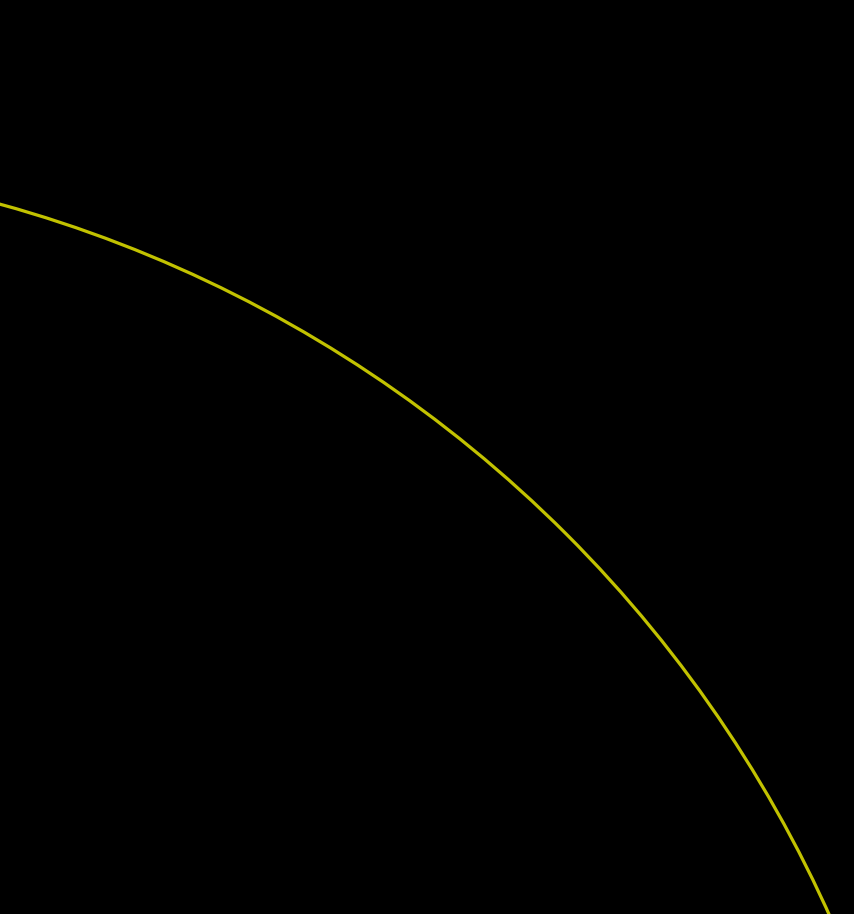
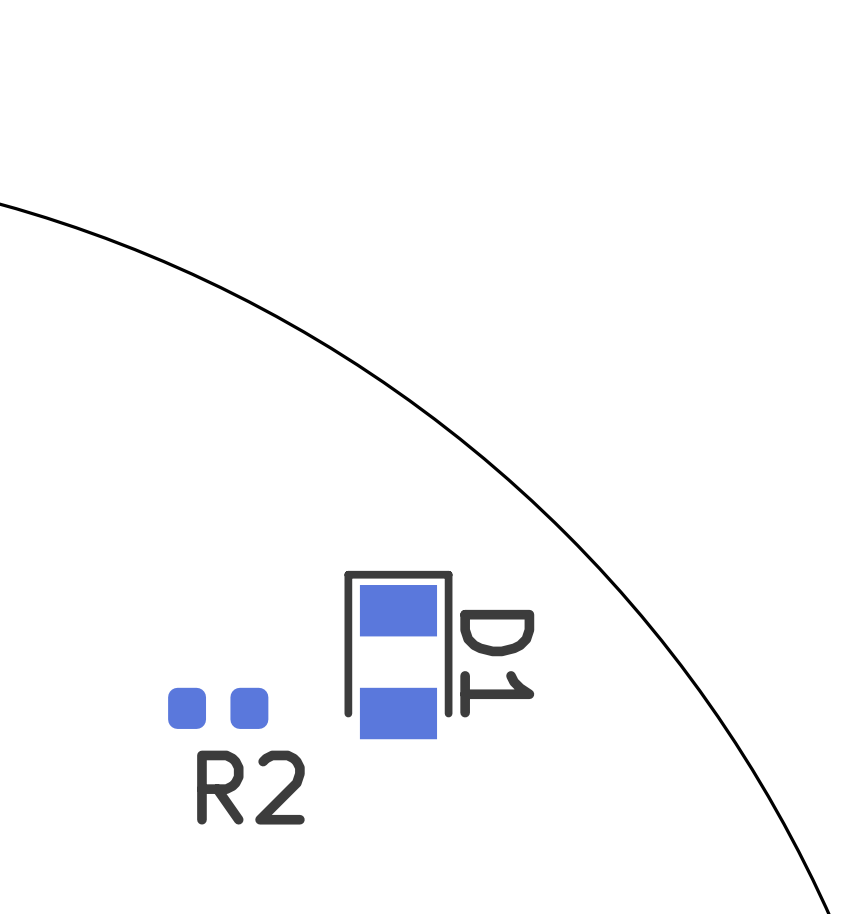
D1: none -> (398, 655)
R2: none -> (218, 708)

